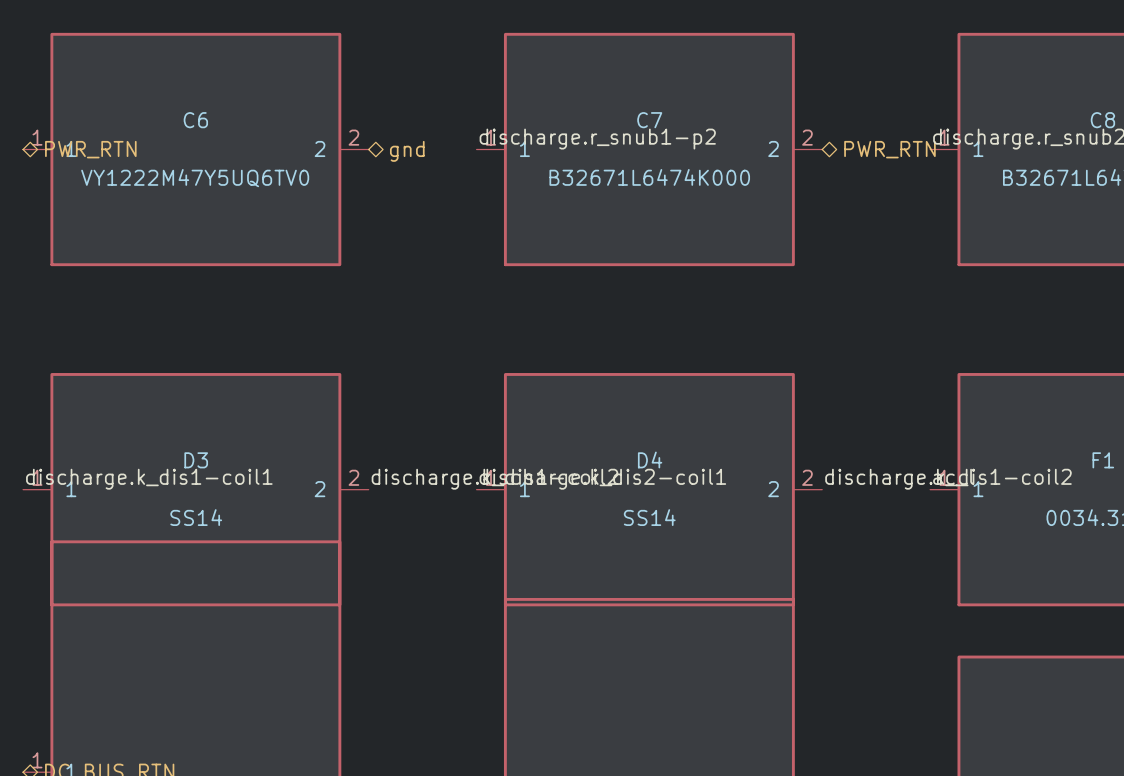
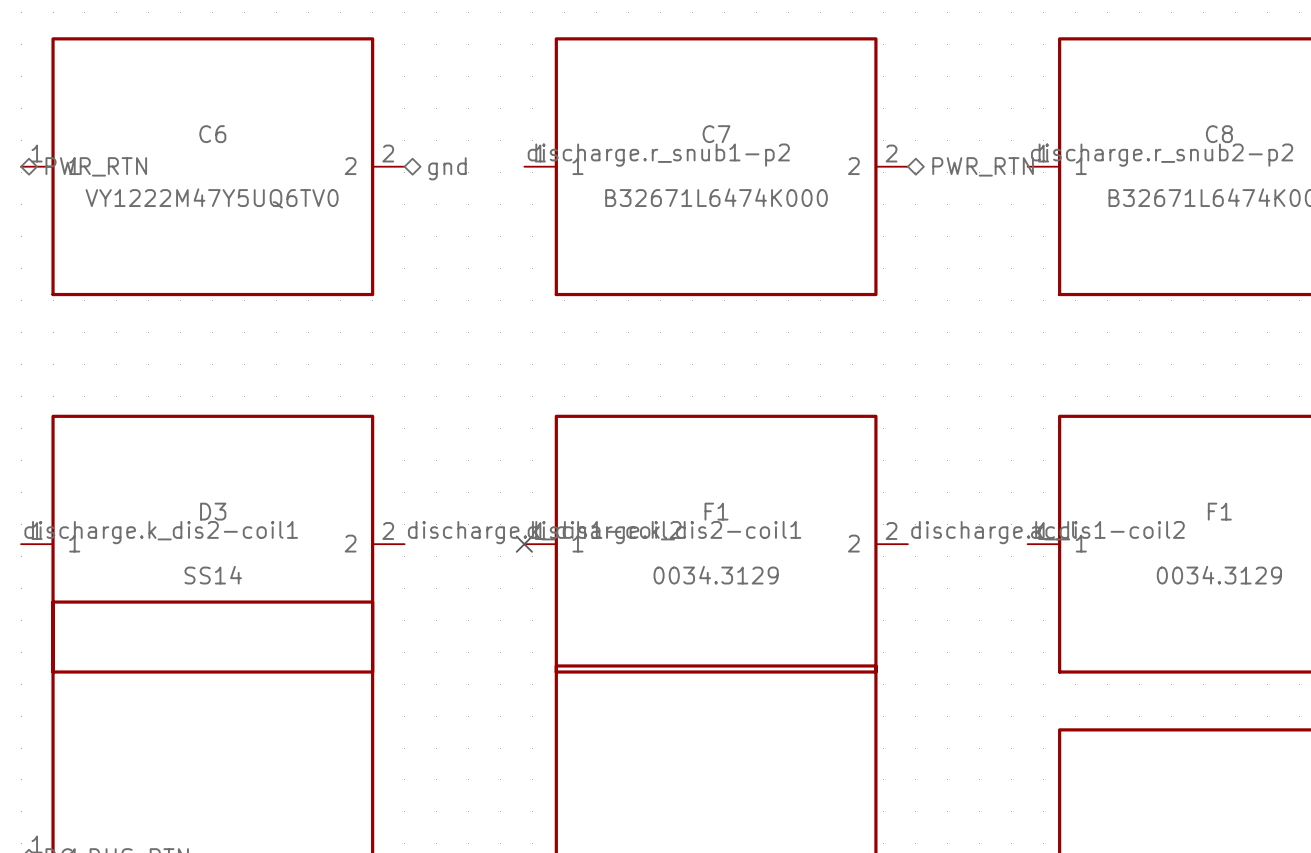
D4 name: D4 (650, 459) -> F1 (716, 511)
label: discharge.k_dis1-coil1 (149, 479) -> discharge.k_dis2-coil1 (161, 532)
no-connect mark: none -> (524, 544)
D4 value: SS14 (649, 517) -> 0034.3129 (716, 575)

